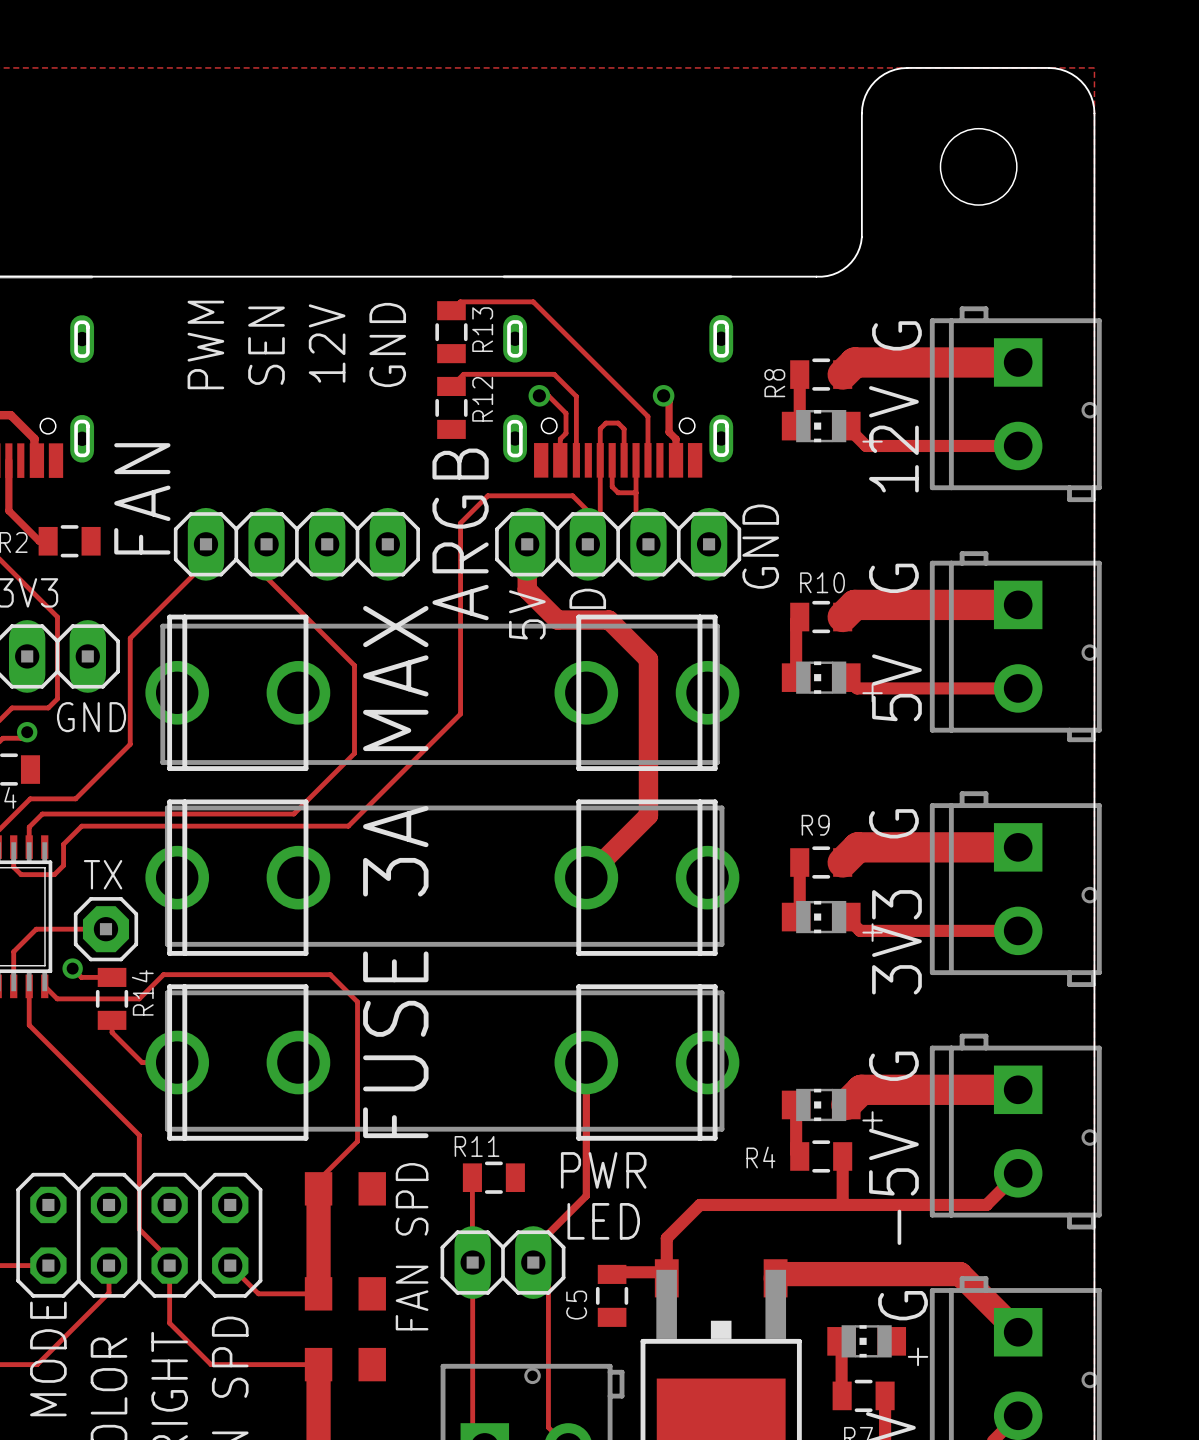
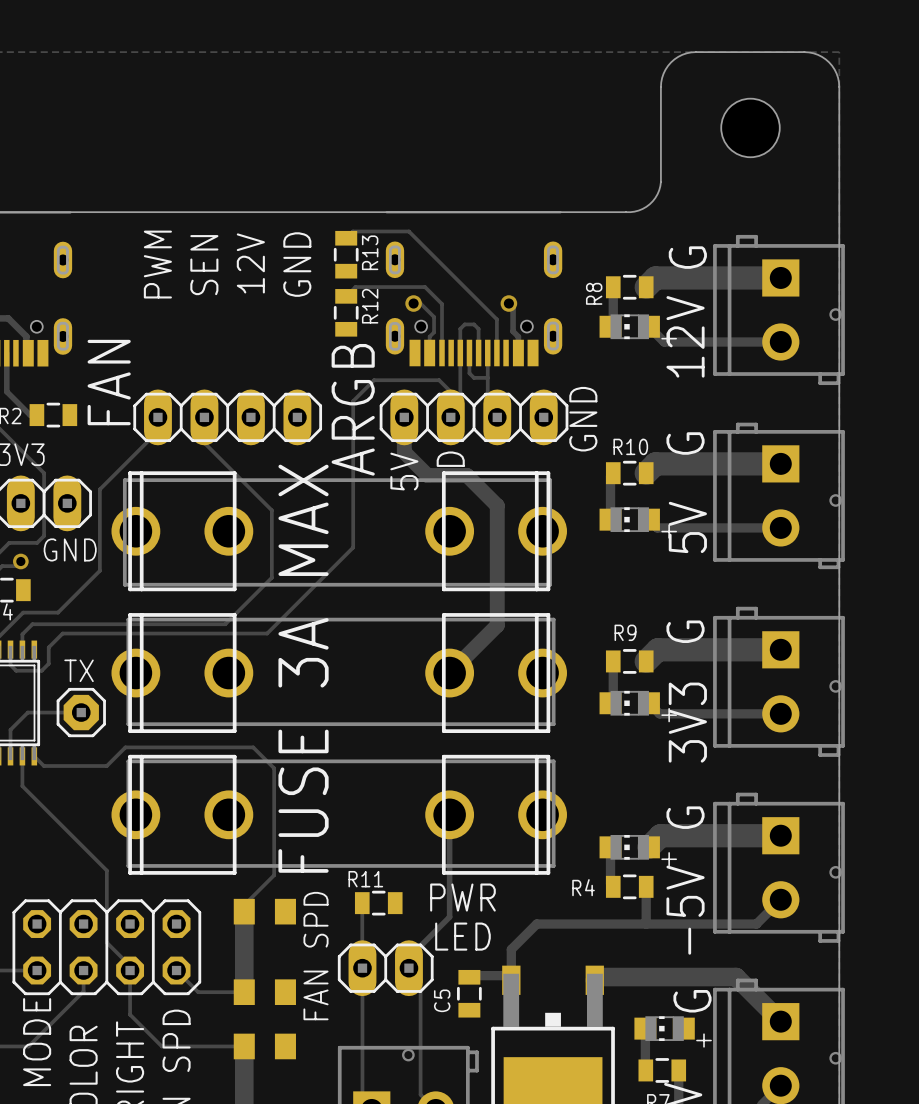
track: (72, 968) (81, 977) (112, 977) -> none
via: (72, 968) -> none
R14: (112, 998) -> none
track: (112, 1020) (112, 1032) (142, 1062) (177, 1062) -> none

